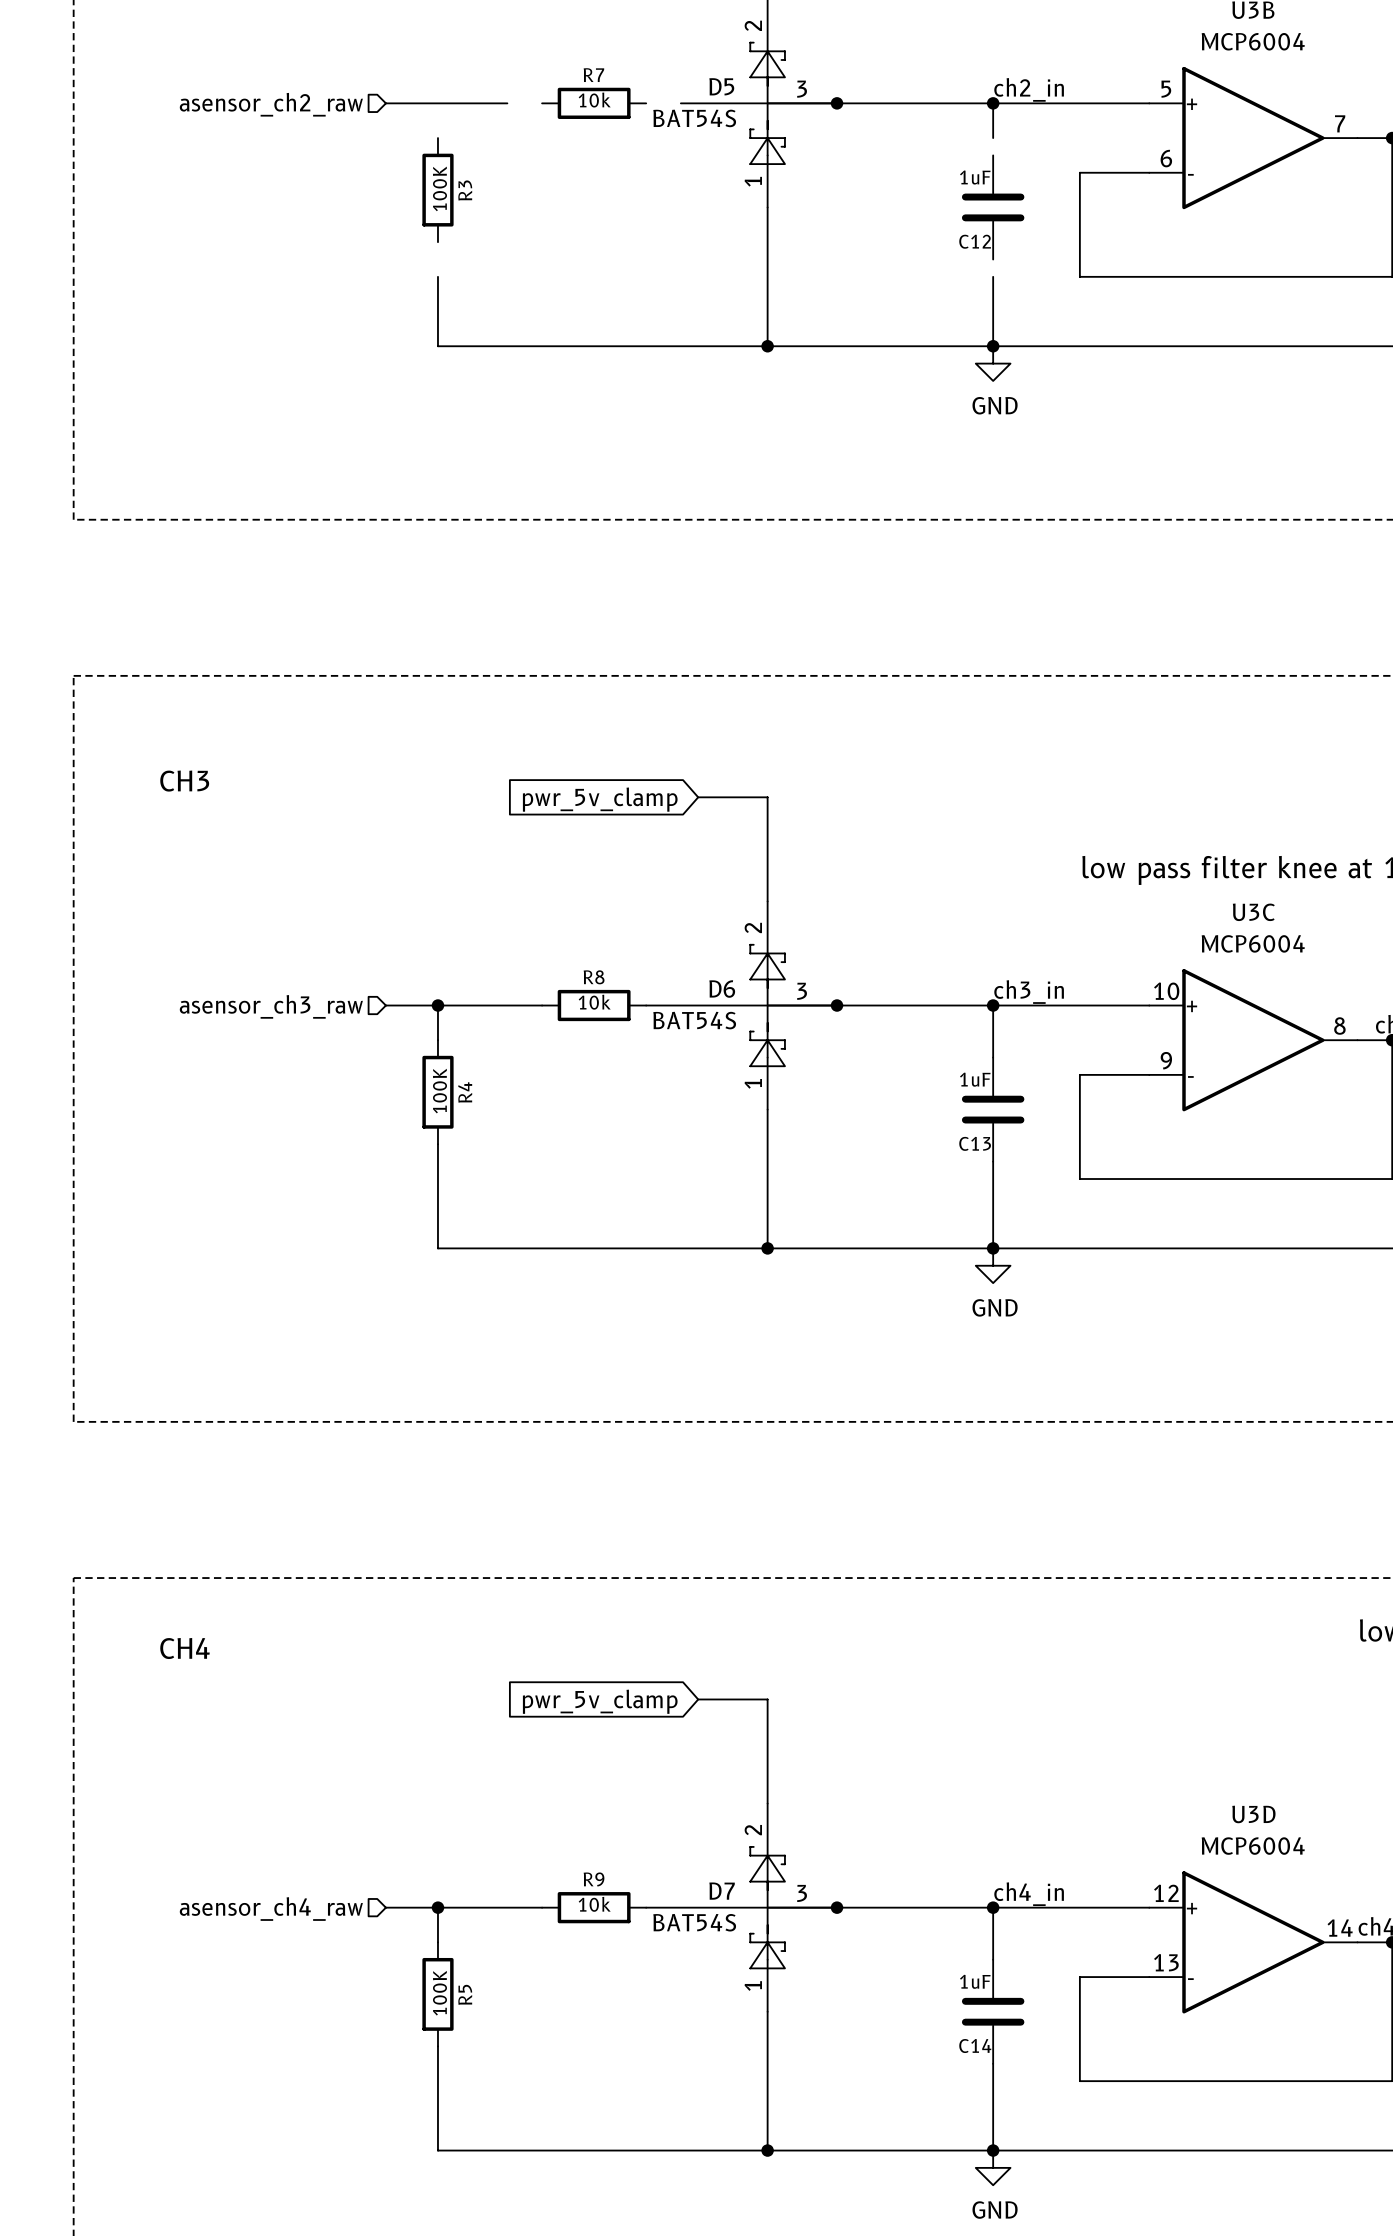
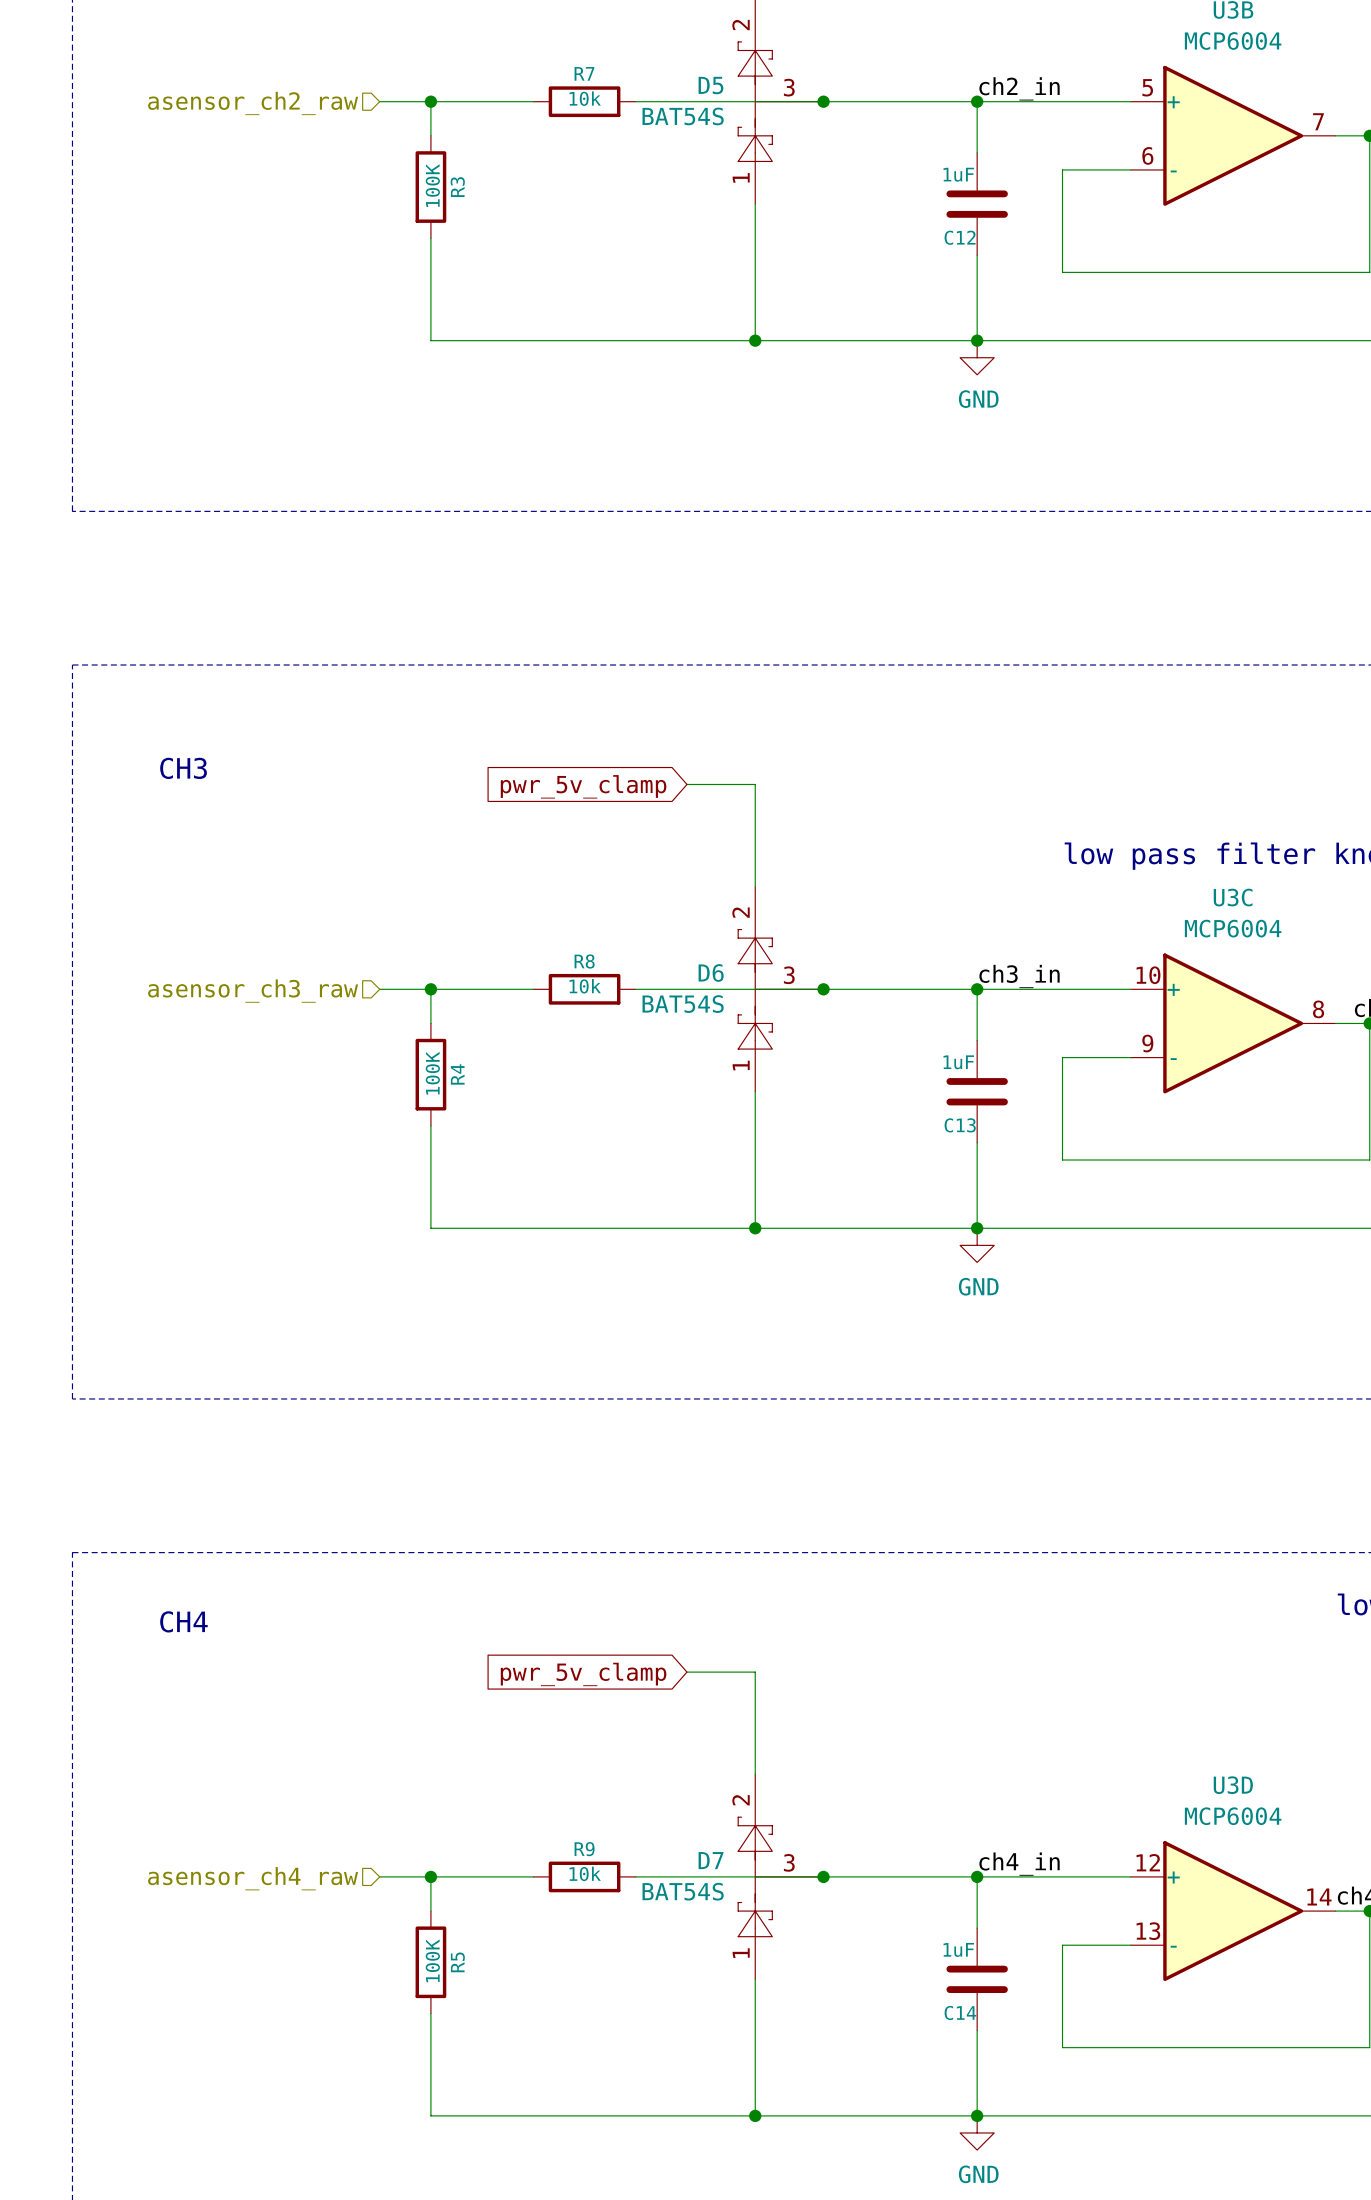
wire: none -> (430, 101) (430, 135)
junction: none -> (430, 101)
wire: none -> (499, 101) (533, 101)
wire: none -> (635, 101) (669, 101)
wire: none -> (977, 135) (977, 152)
wire: none -> (430, 238) (430, 272)
wire: none -> (977, 255) (977, 272)

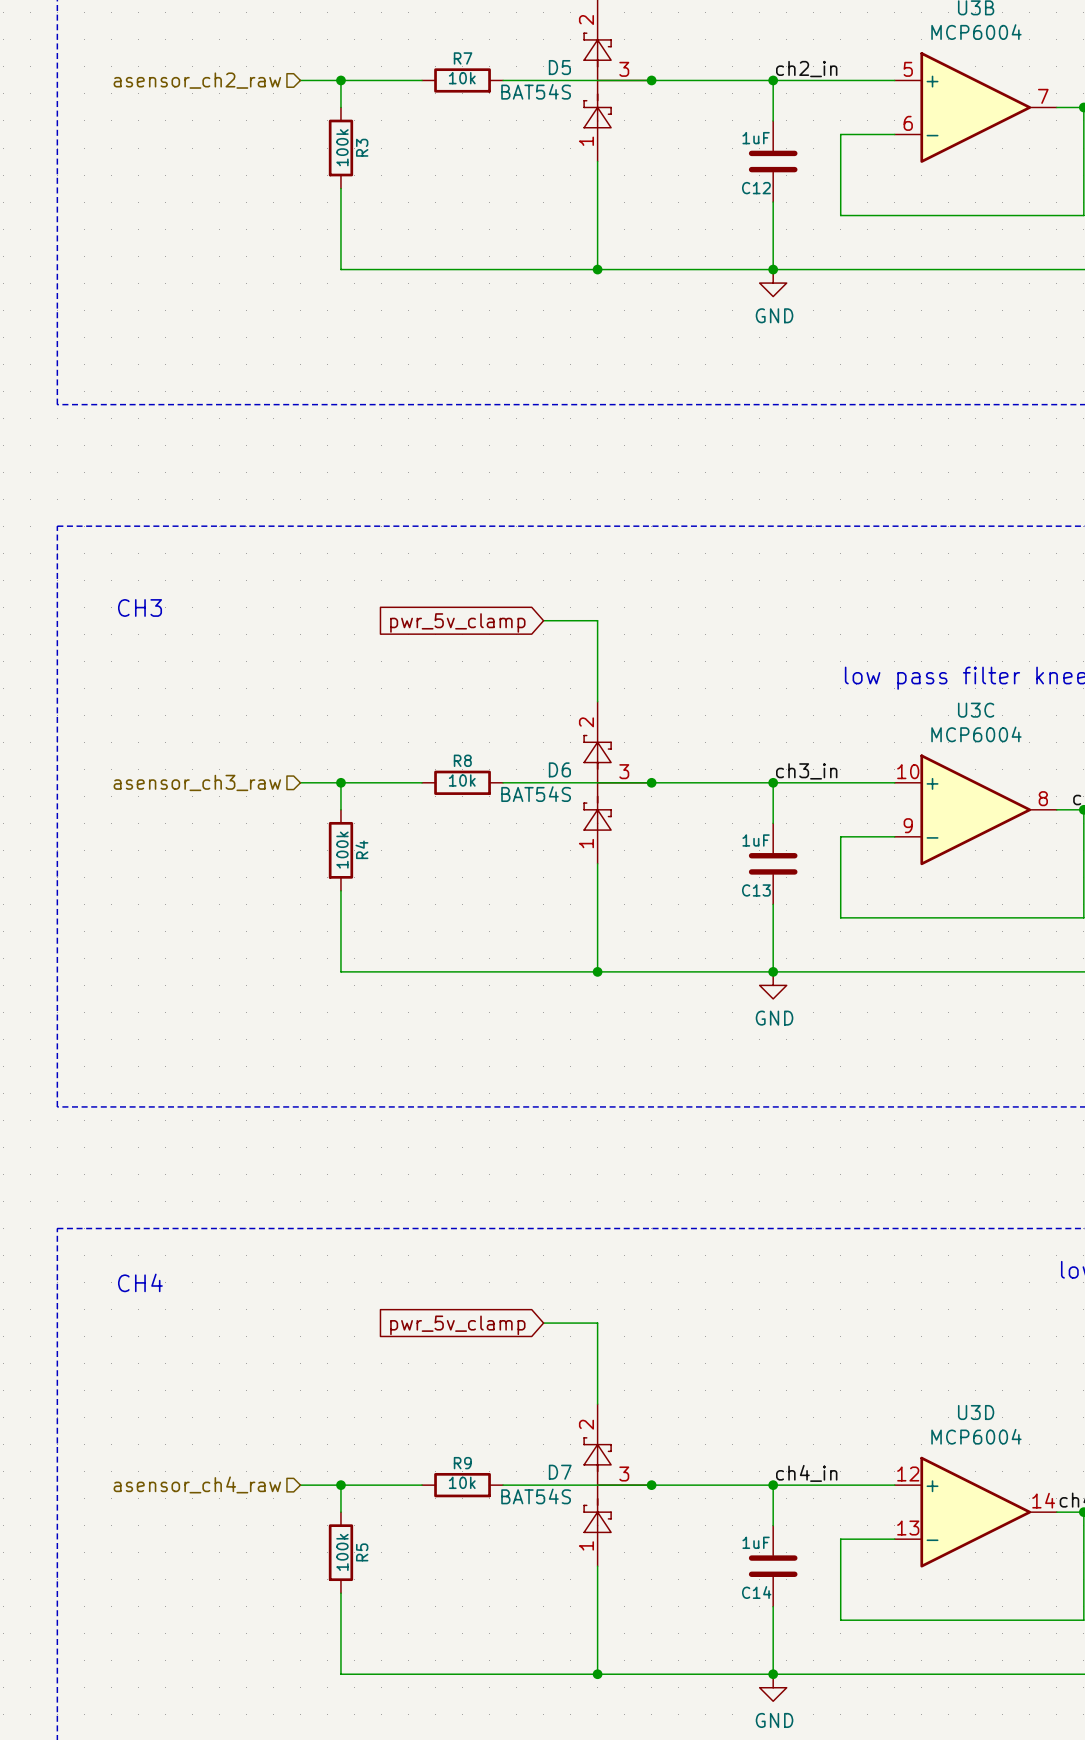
R3 value: 100K (432, 185) -> 100k (342, 147)
R4 value: 100K (432, 1073) -> 100k (342, 850)
R5 value: 100K (432, 1960) -> 100k (342, 1552)

